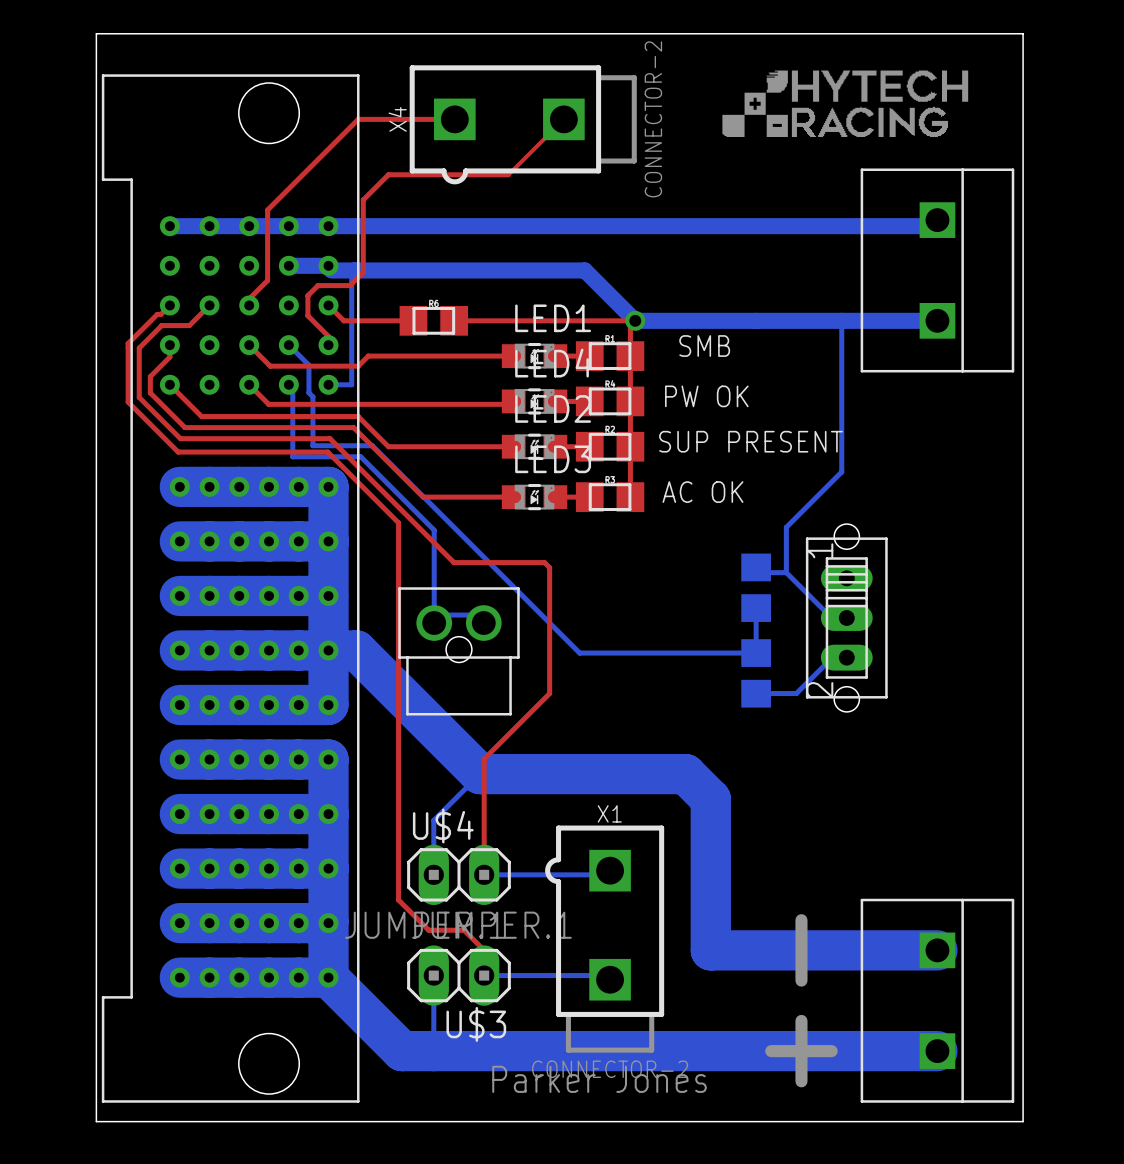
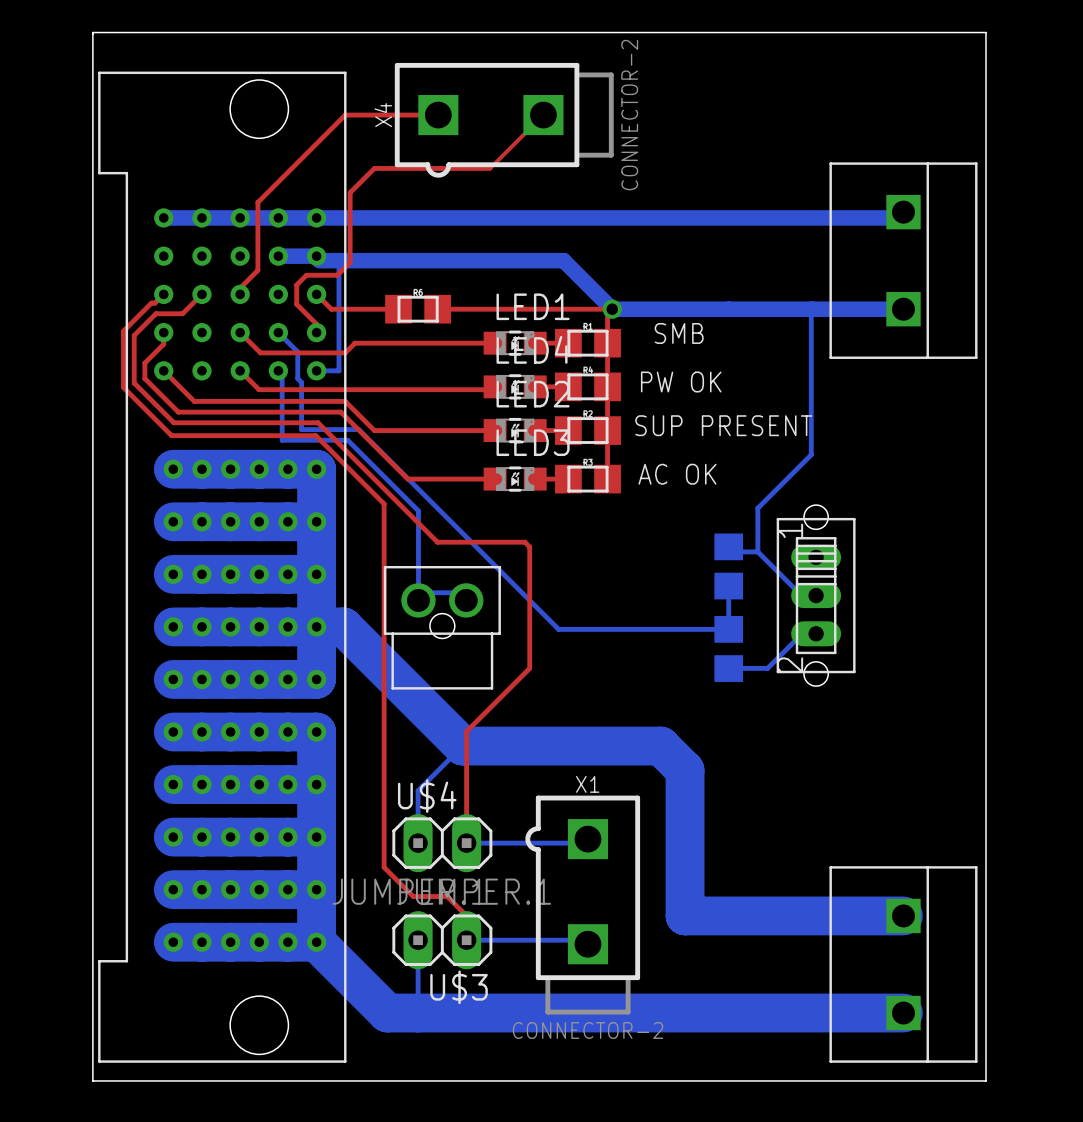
drawing: [722, 70, 969, 138] -> none
line: (801, 920) (801, 980) -> none
line: (801, 1020) (801, 1081) -> none
line: (771, 1051) (831, 1051) -> none
text: Parker Jones (599, 1079) -> none

